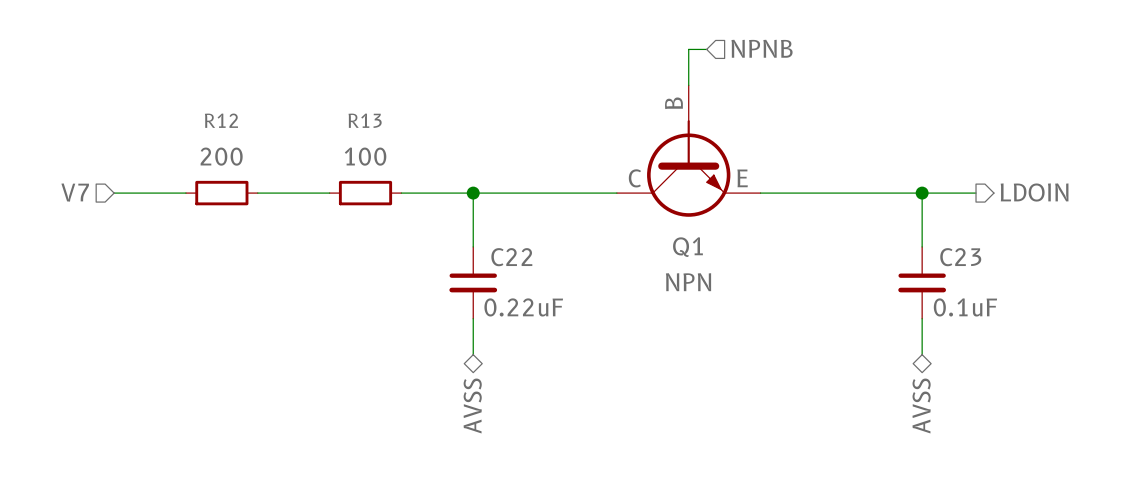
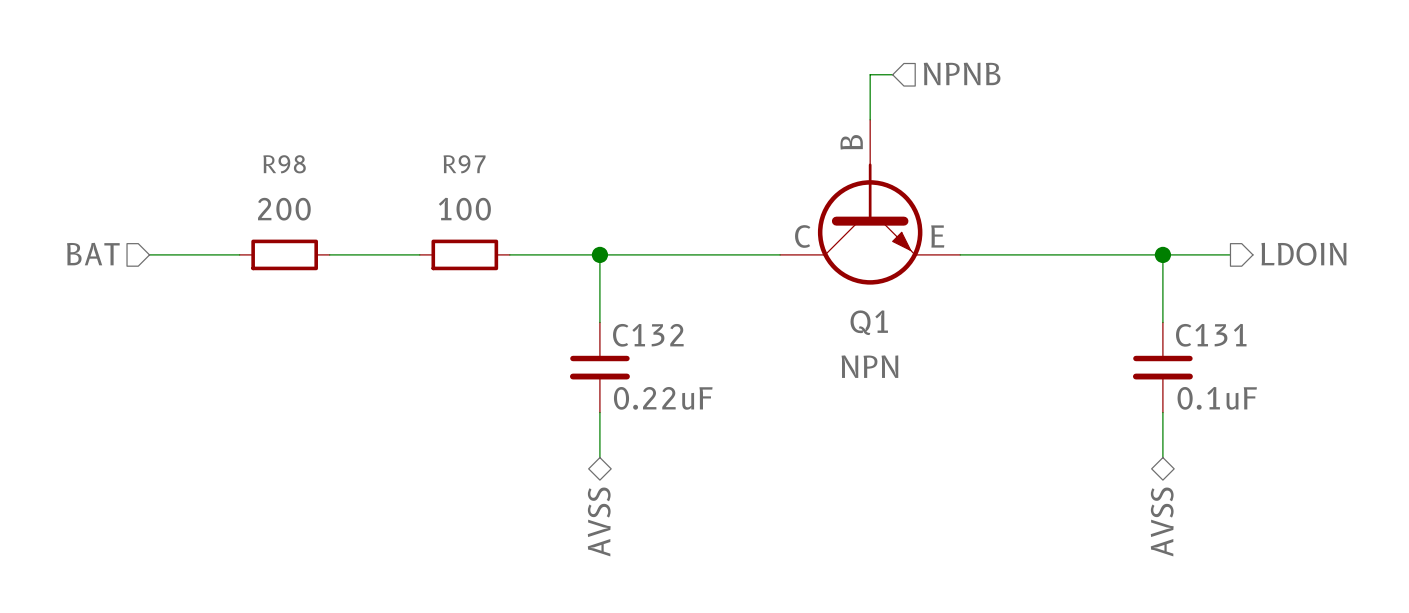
R12 name: R12 (221, 120) -> R98 (284, 164)
R13 name: R13 (365, 120) -> R97 (464, 164)
hierarchical label: V7 (75, 192) -> BAT (93, 254)
C22 name: C22 (511, 257) -> C132 (648, 335)
C23 name: C23 (960, 257) -> C131 (1211, 335)

